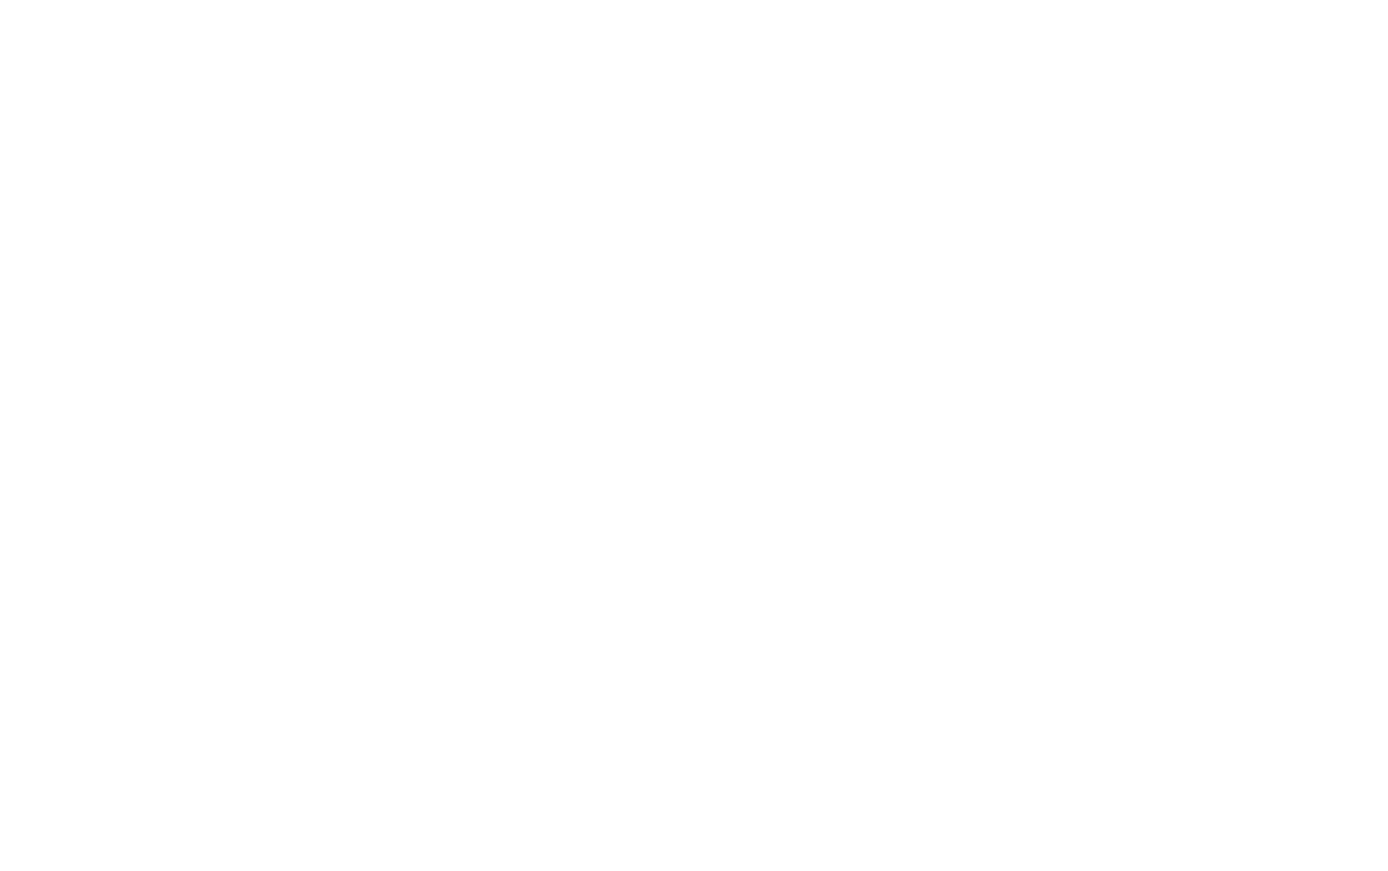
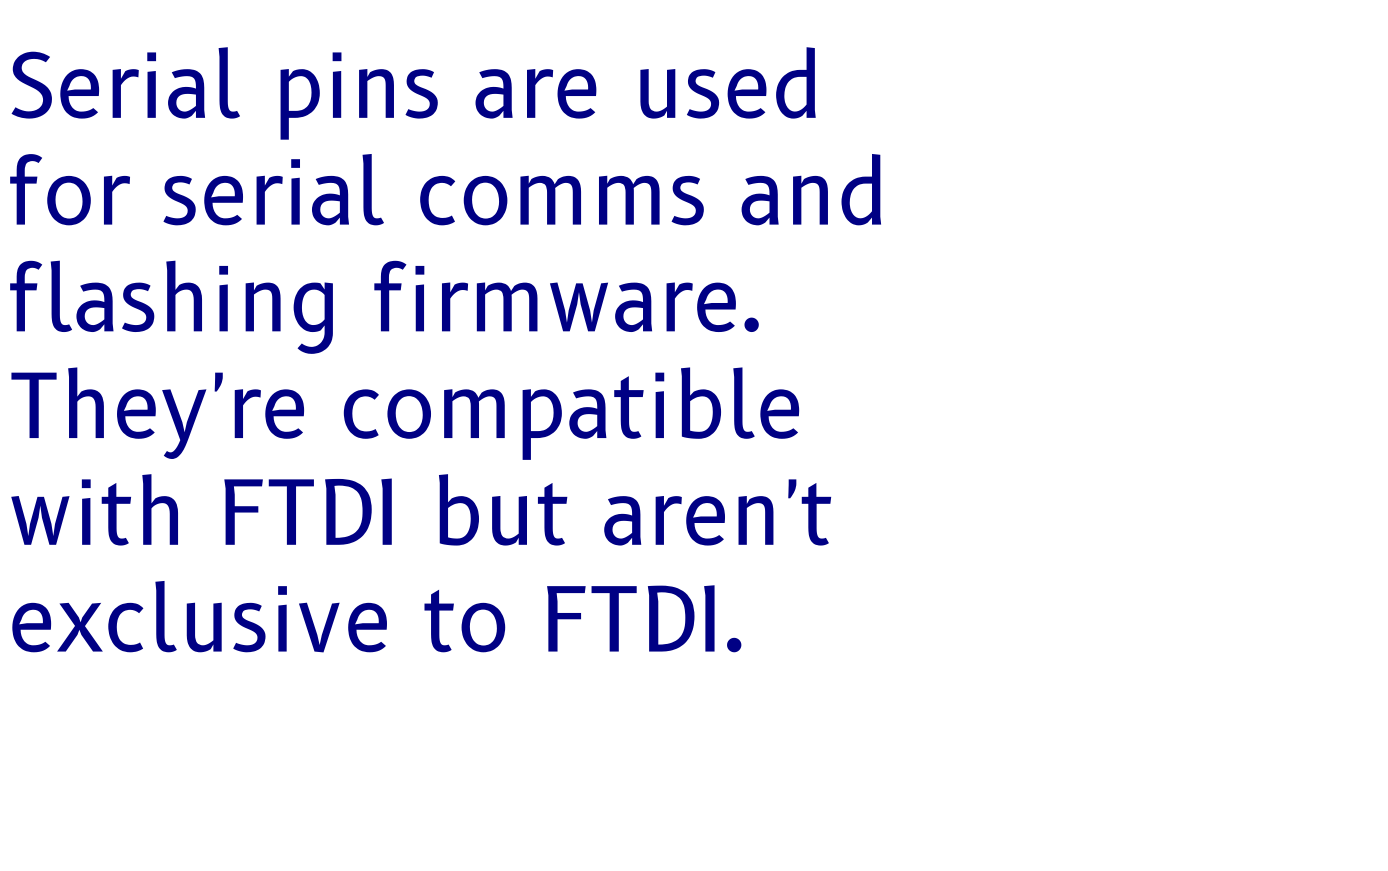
text: none -> Serial pins are used (413, 93)
text: none -> for serial comms and (445, 189)
text: none -> flashing firmware. (384, 307)
text: none -> They're compatible (405, 413)
text: none -> with FTDI but aren't (421, 509)
text: none -> exclusive to FTDI. (376, 616)

